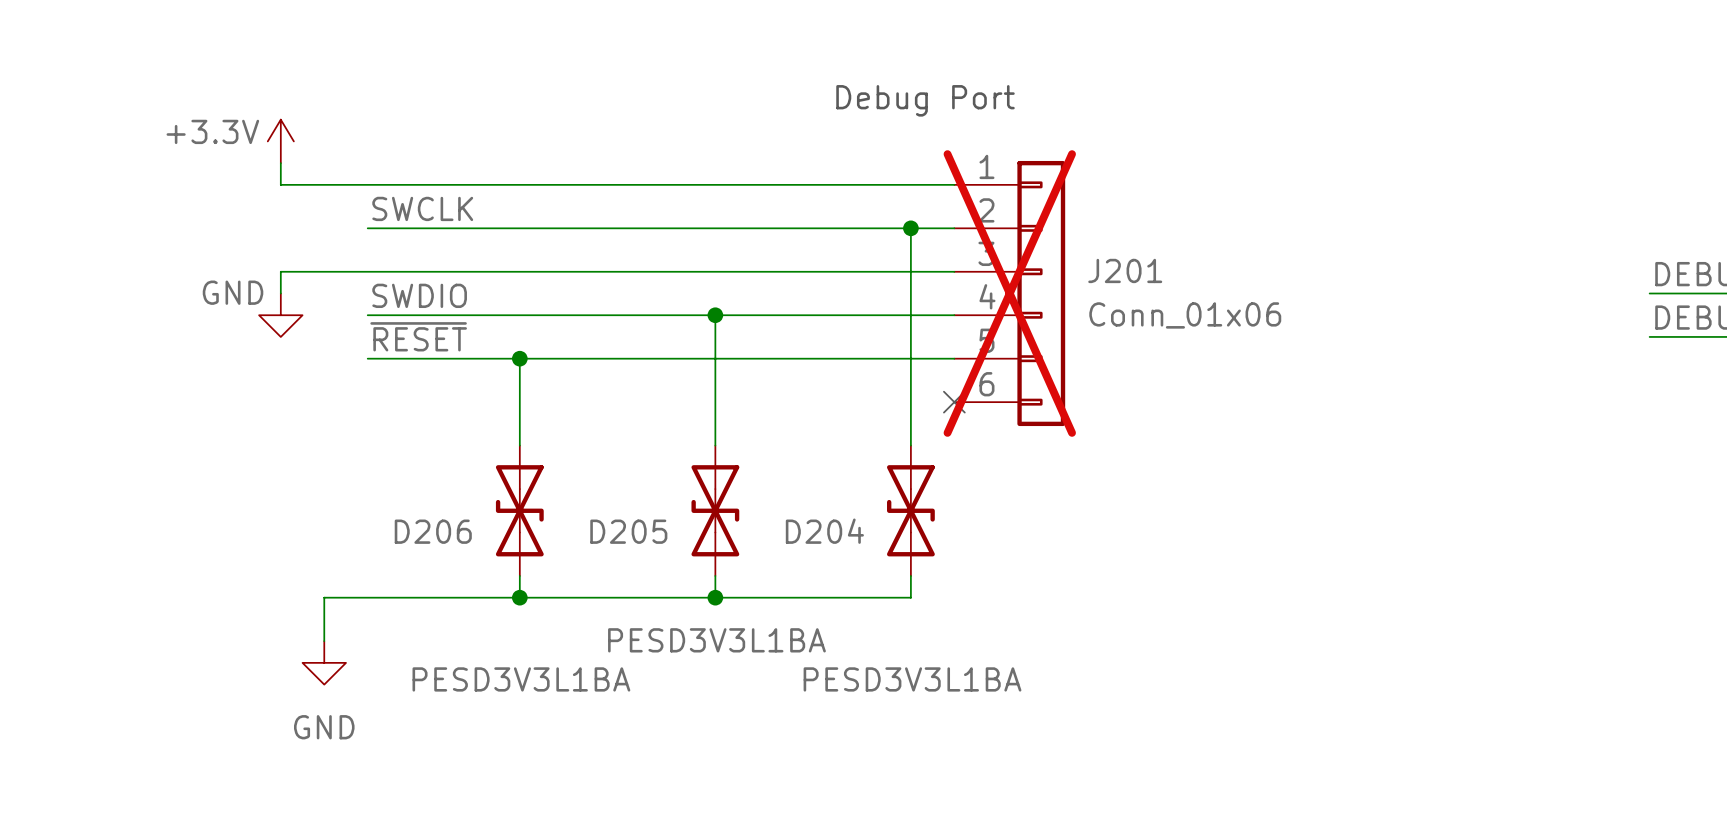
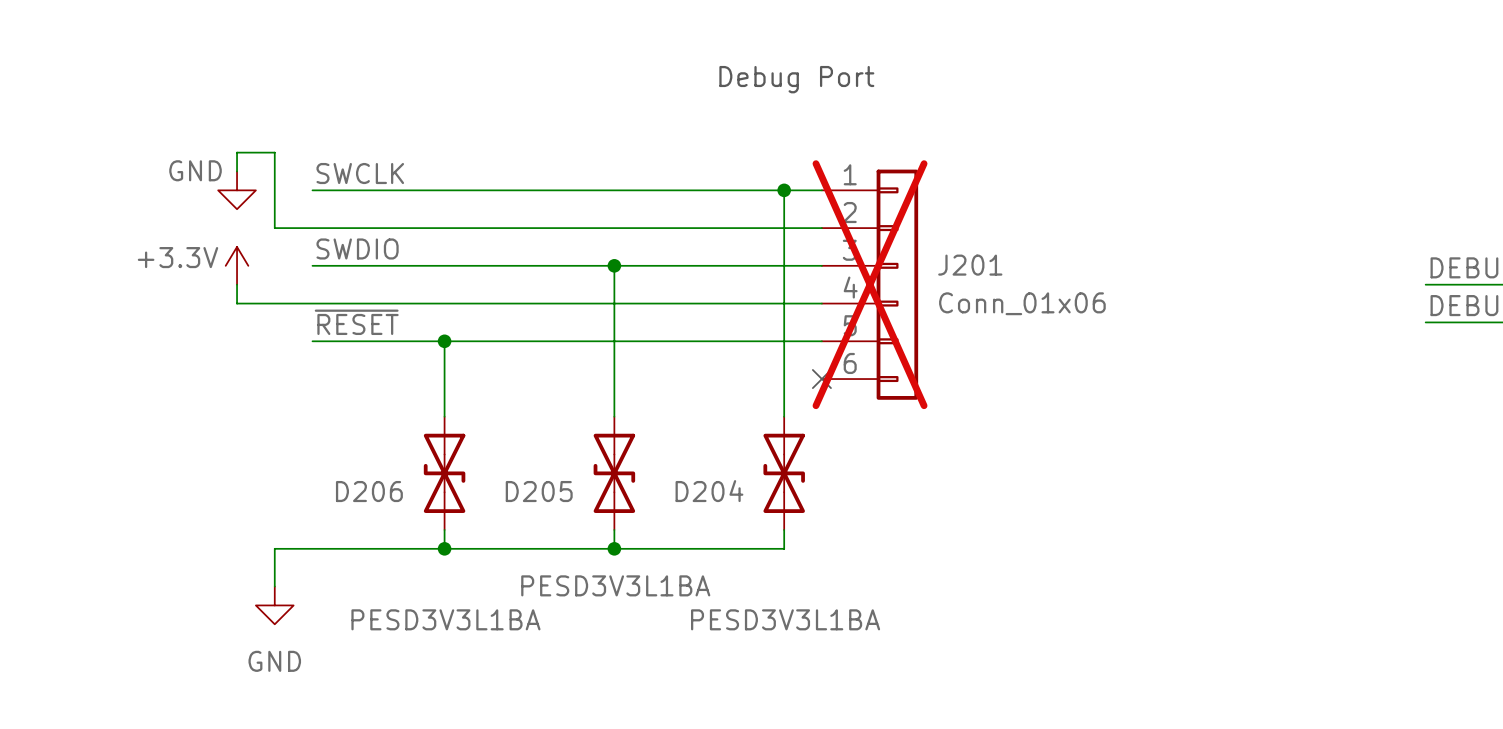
text position: Debug Port (925, 100) -> Debug Port (796, 79)
power symbol position: +3.3V (280, 141) -> +3.3V (237, 265)
wire: (280, 163) (280, 184) (367, 184) -> (237, 171) (237, 152) (274, 152) (274, 228) (312, 228)
wire: none -> (784, 190) (784, 228)
label position: SWCLK (422, 208) -> SWCLK (360, 173)
junction position: (910, 228) -> (784, 190)
wire: (367, 271) (280, 271) (280, 293) -> (312, 303) (237, 303) (237, 284)
wire: none -> (614, 265) (614, 303)
label position: SWDIO (419, 295) -> SWDIO (357, 248)
power symbol position: GND (280, 315) -> GND (237, 190)
junction position: (715, 315) -> (614, 265)

